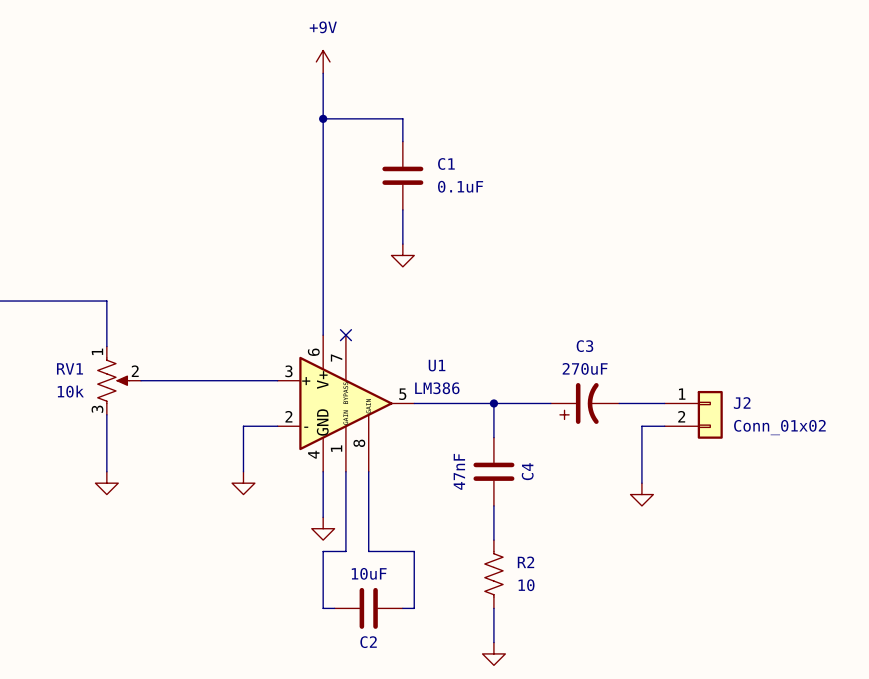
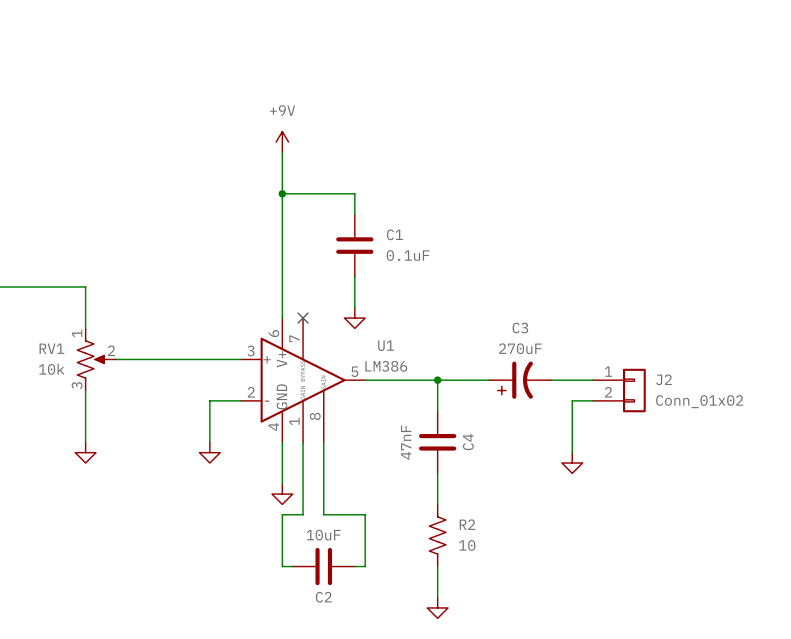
power symbol position: +9V (323, 61) -> +9V (282, 142)
wire: (323, 73) (323, 153) -> none
wire: (323, 118) (402, 118) (402, 141) -> none
junction: (323, 118) -> none
C1 position: (402, 175) -> (354, 245)
wire: none -> (282, 193) (354, 193) (354, 204)
junction: none -> (282, 193)
power symbol position: (402, 255) -> (354, 318)
wire: none -> (354, 276) (354, 307)

